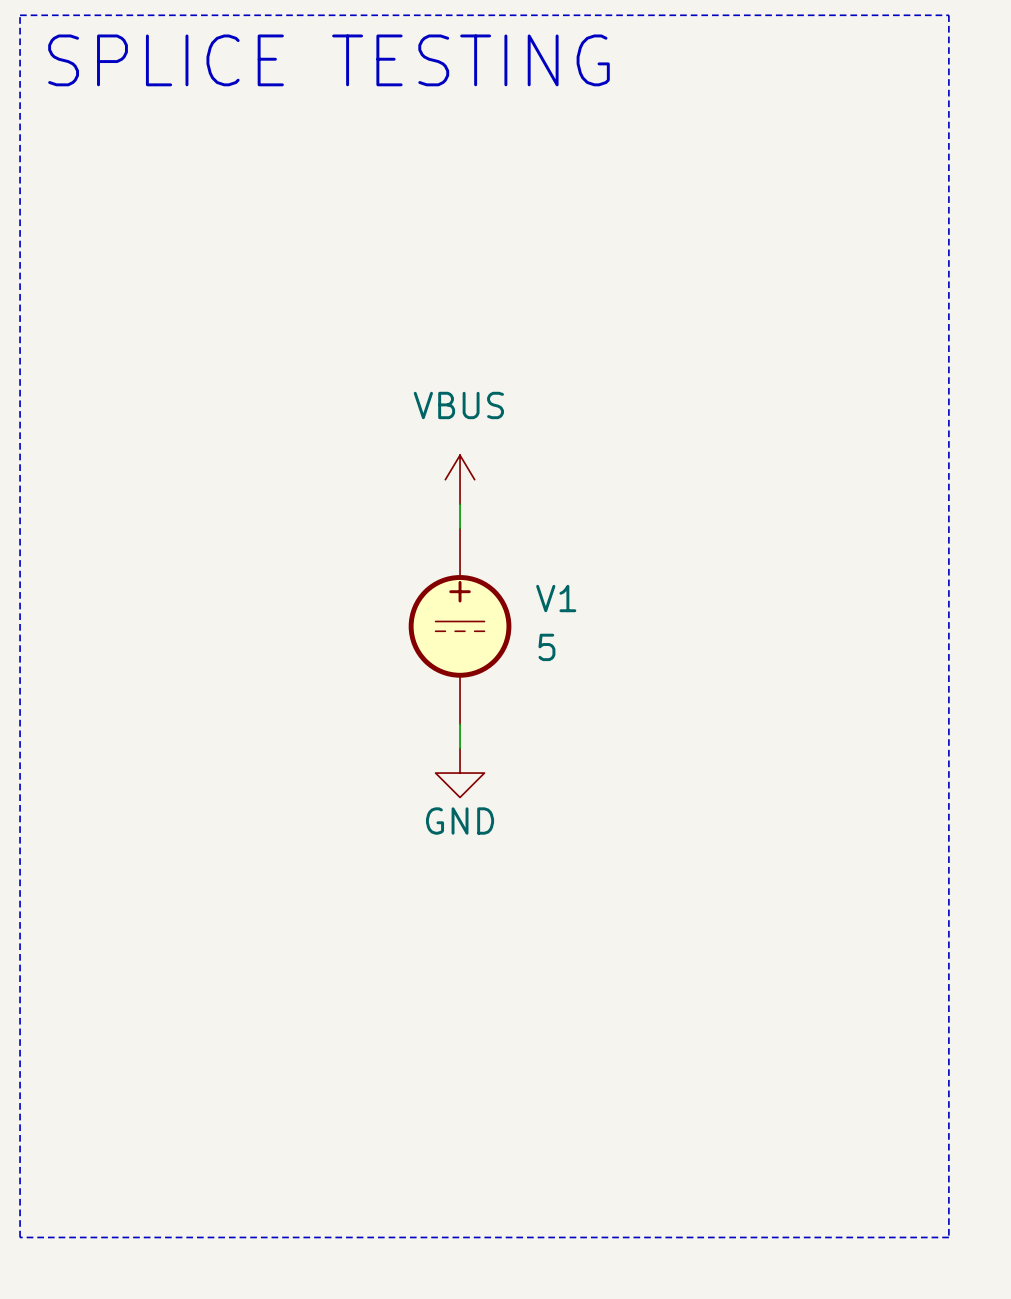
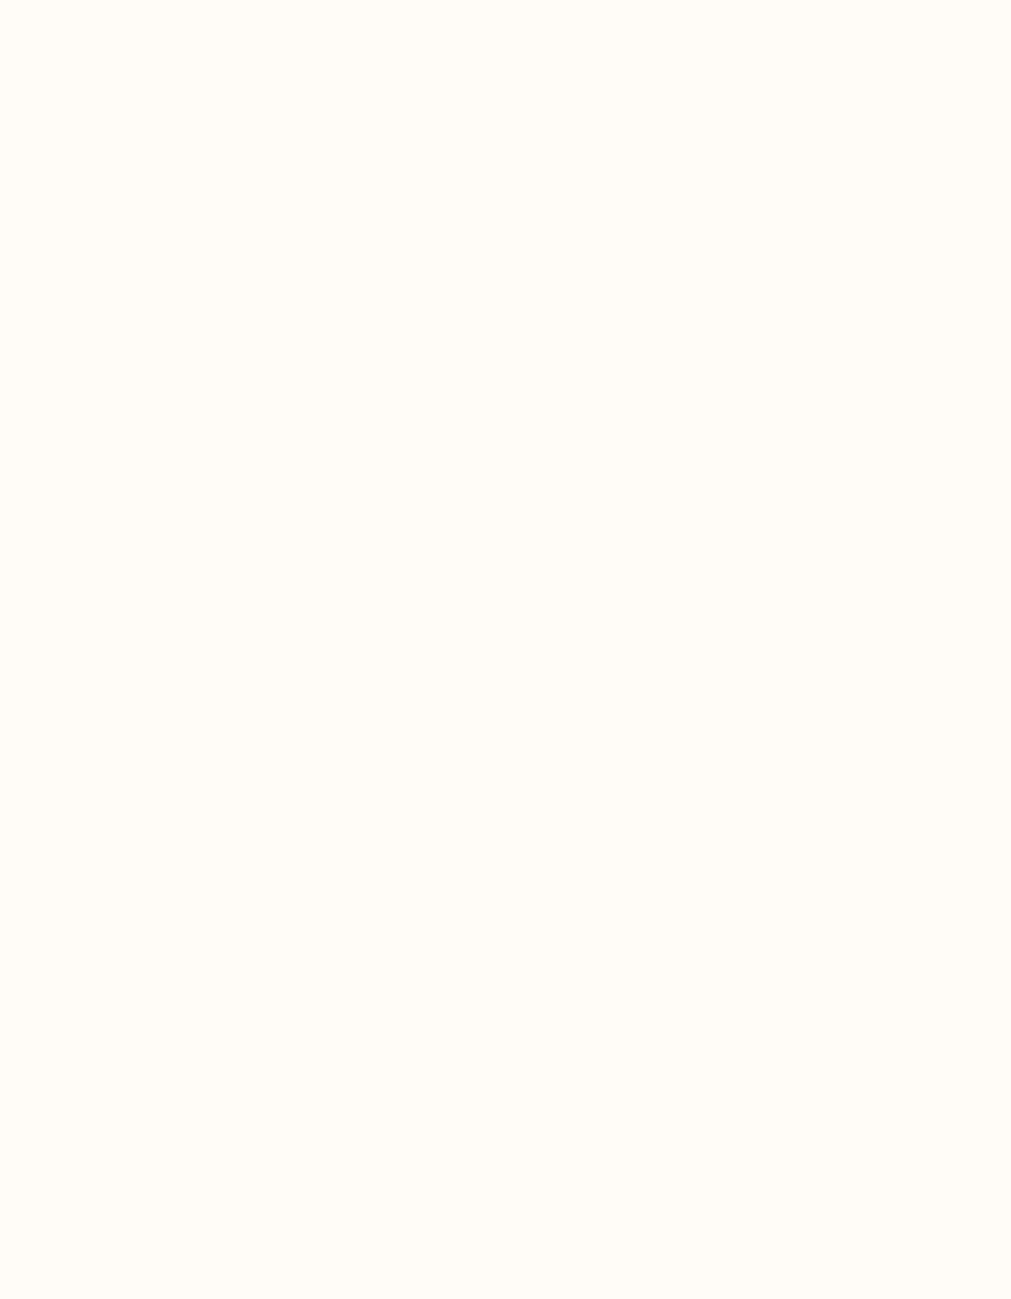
line: (20, 15) (948, 15) (948, 1237) (20, 1237) (20, 15) -> none
text: SPLICE TESTING (328, 60) -> none
power symbol: VBUS (460, 479) -> none
wire: (460, 504) (460, 528) -> none
V1: 5 (460, 626) -> none
wire: (460, 724) (460, 748) -> none
power symbol: GND (460, 773) -> none

